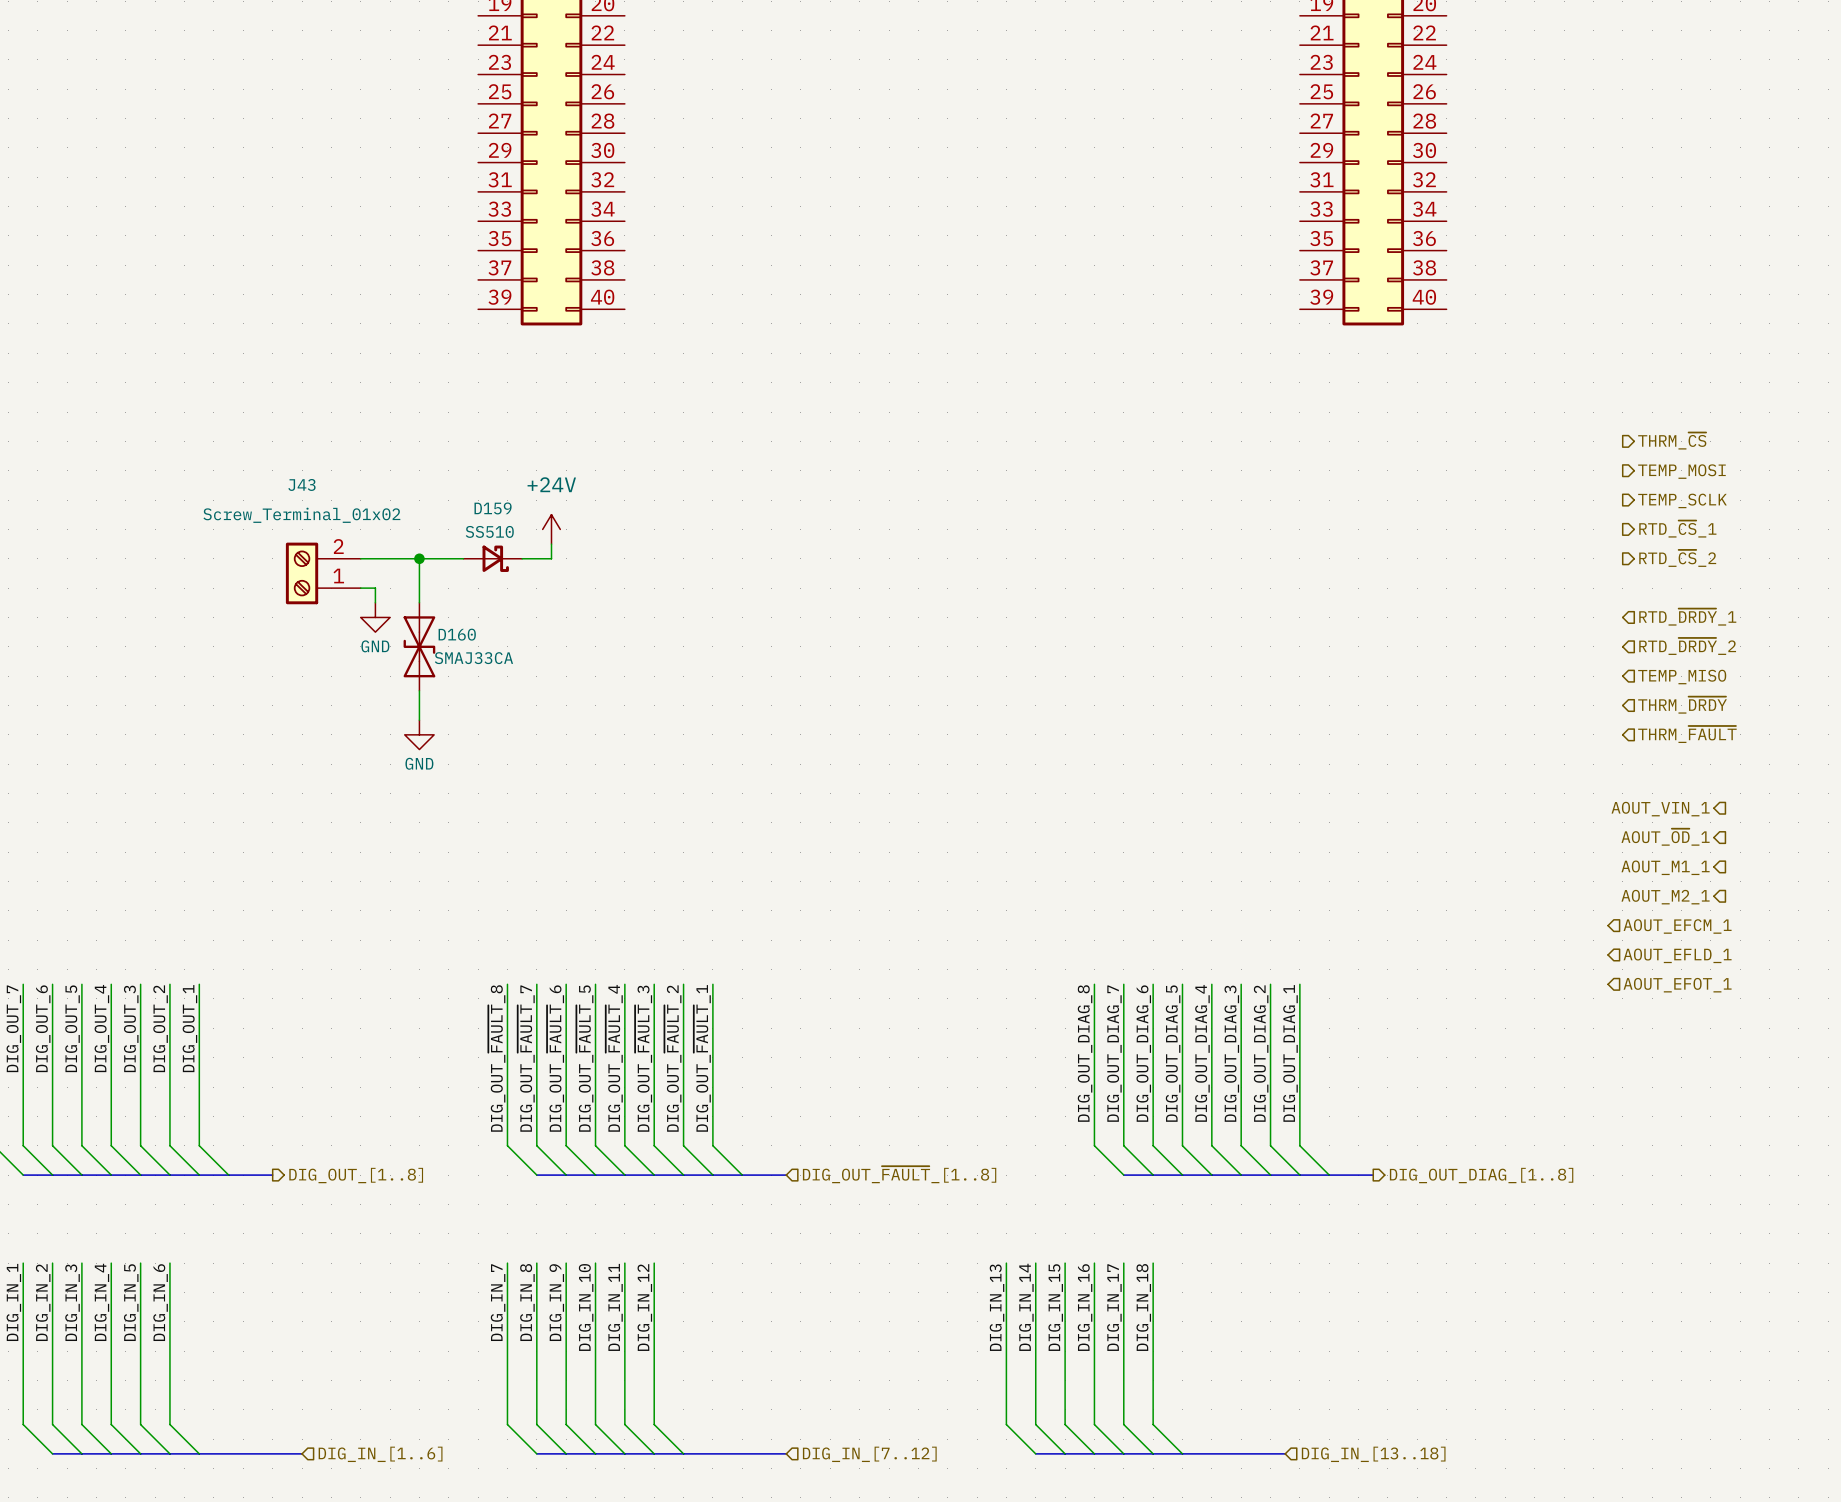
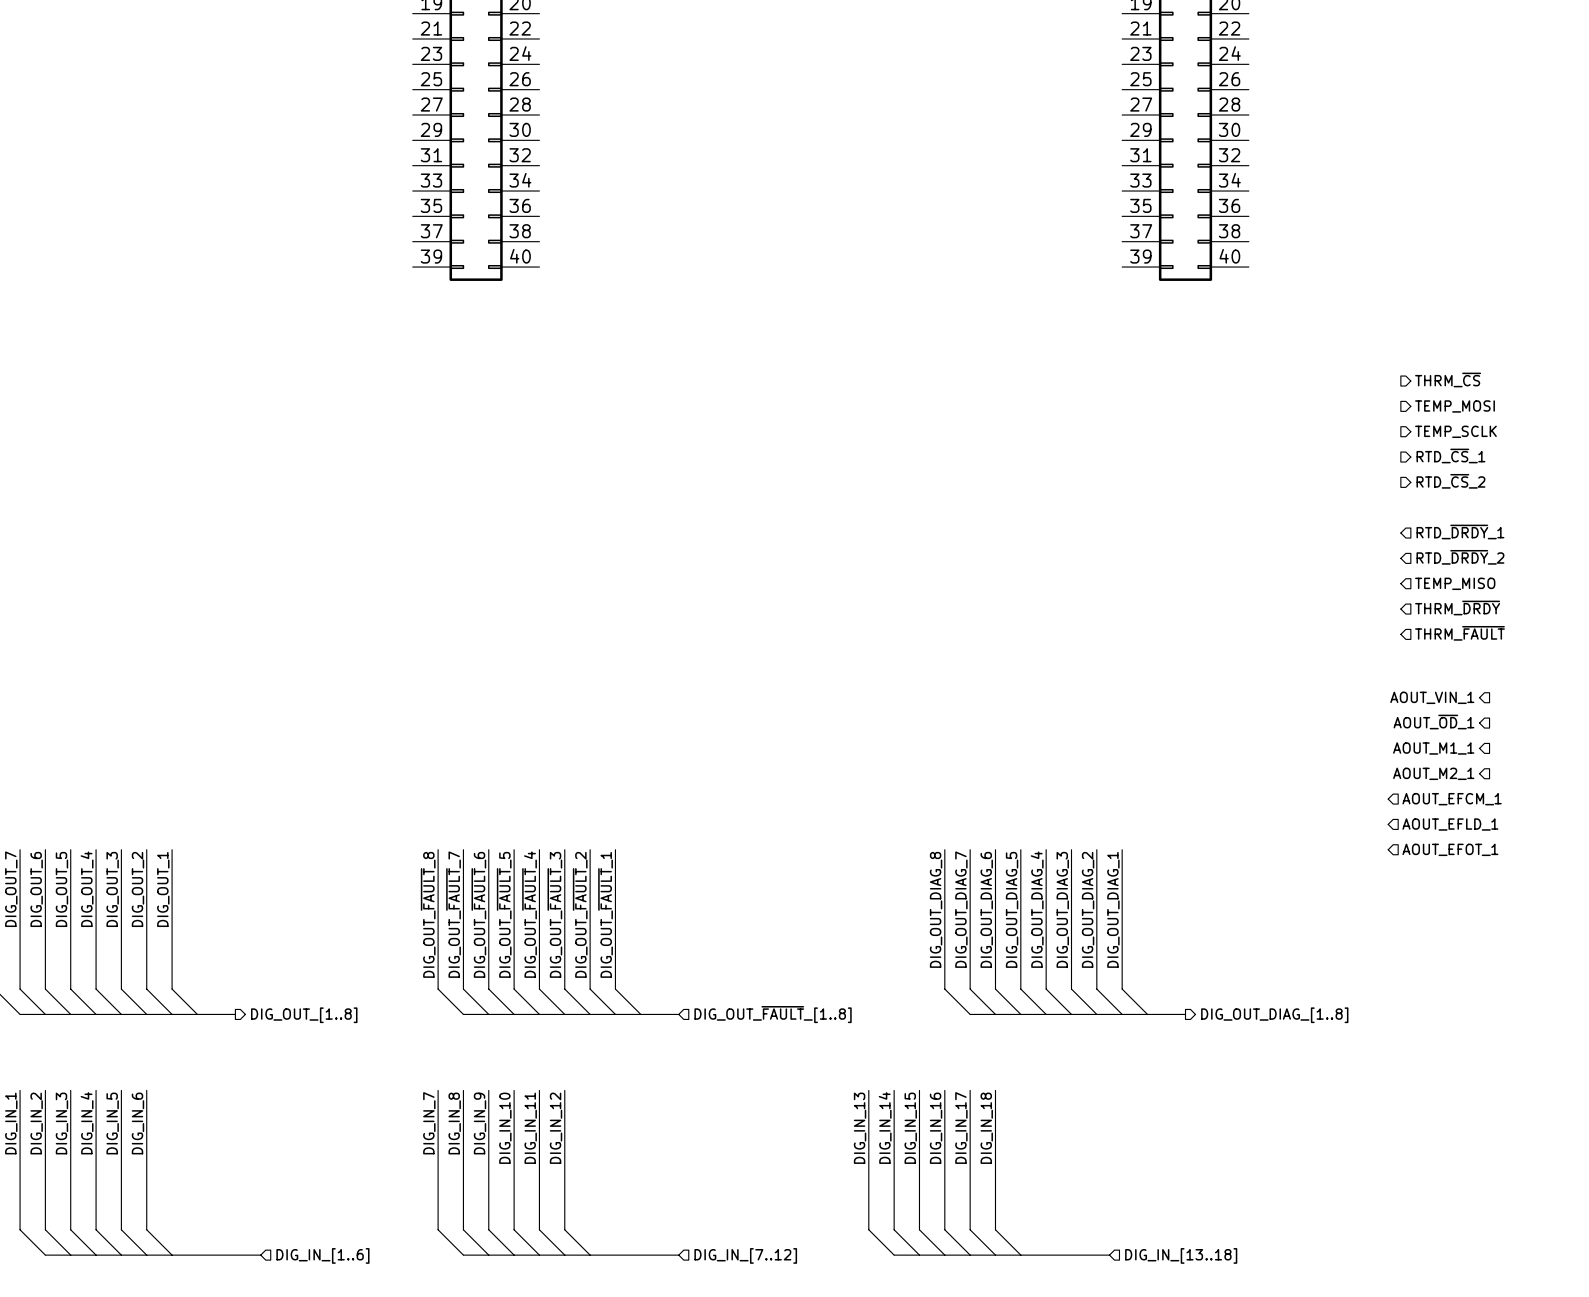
power symbol: +24V (551, 529) -> none
wire: (551, 544) (551, 558) (522, 558) -> none
wire: (360, 558) (463, 558) -> none
wire: (419, 558) (419, 602) -> none
junction: (419, 558) -> none
D159: SS510 (492, 558) -> none
J43: Screw_Terminal_01x02 (323, 573) -> none
wire: (360, 588) (375, 588) (375, 602) -> none
power symbol: GND (375, 617) -> none
D160: SMAJ33CA (419, 646) -> none
wire: (419, 690) (419, 720) -> none
power symbol: GND (419, 734) -> none

